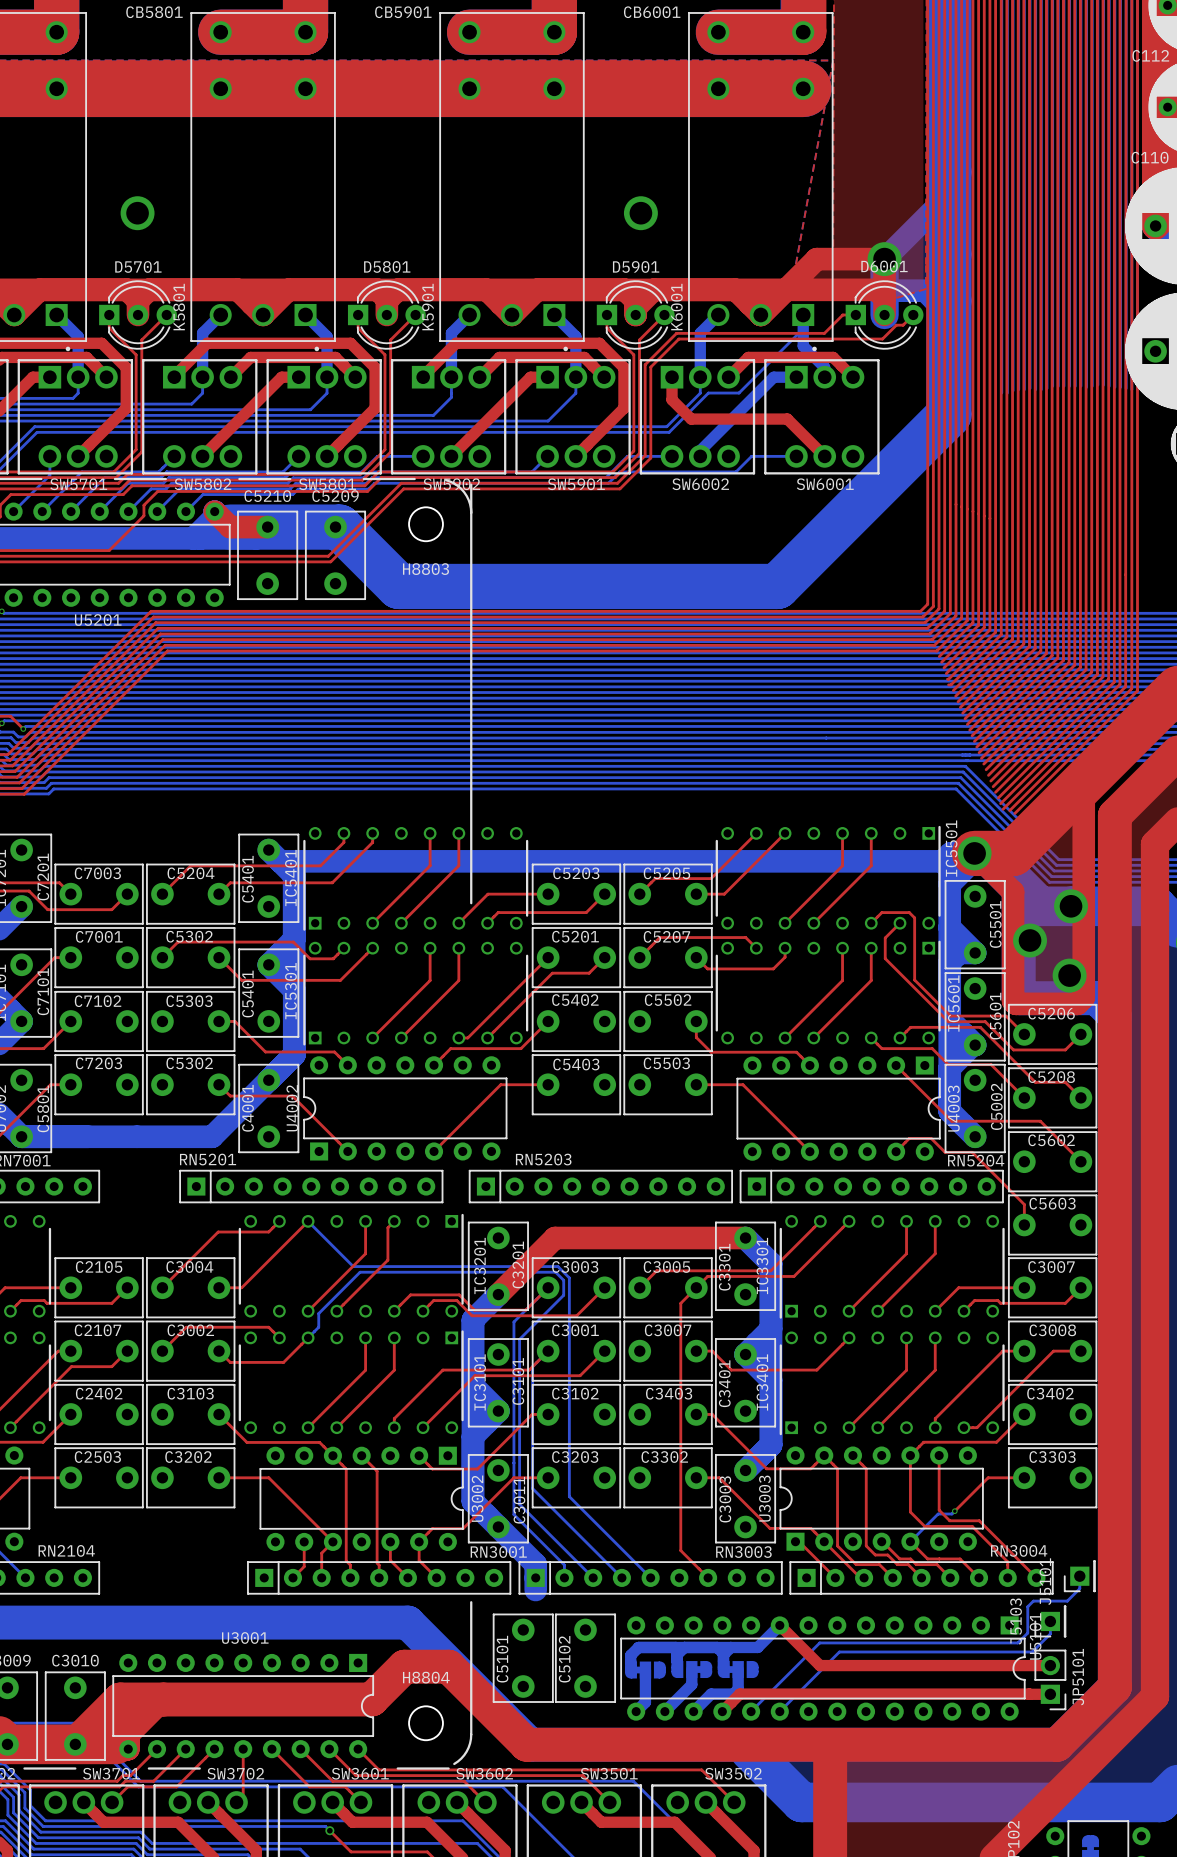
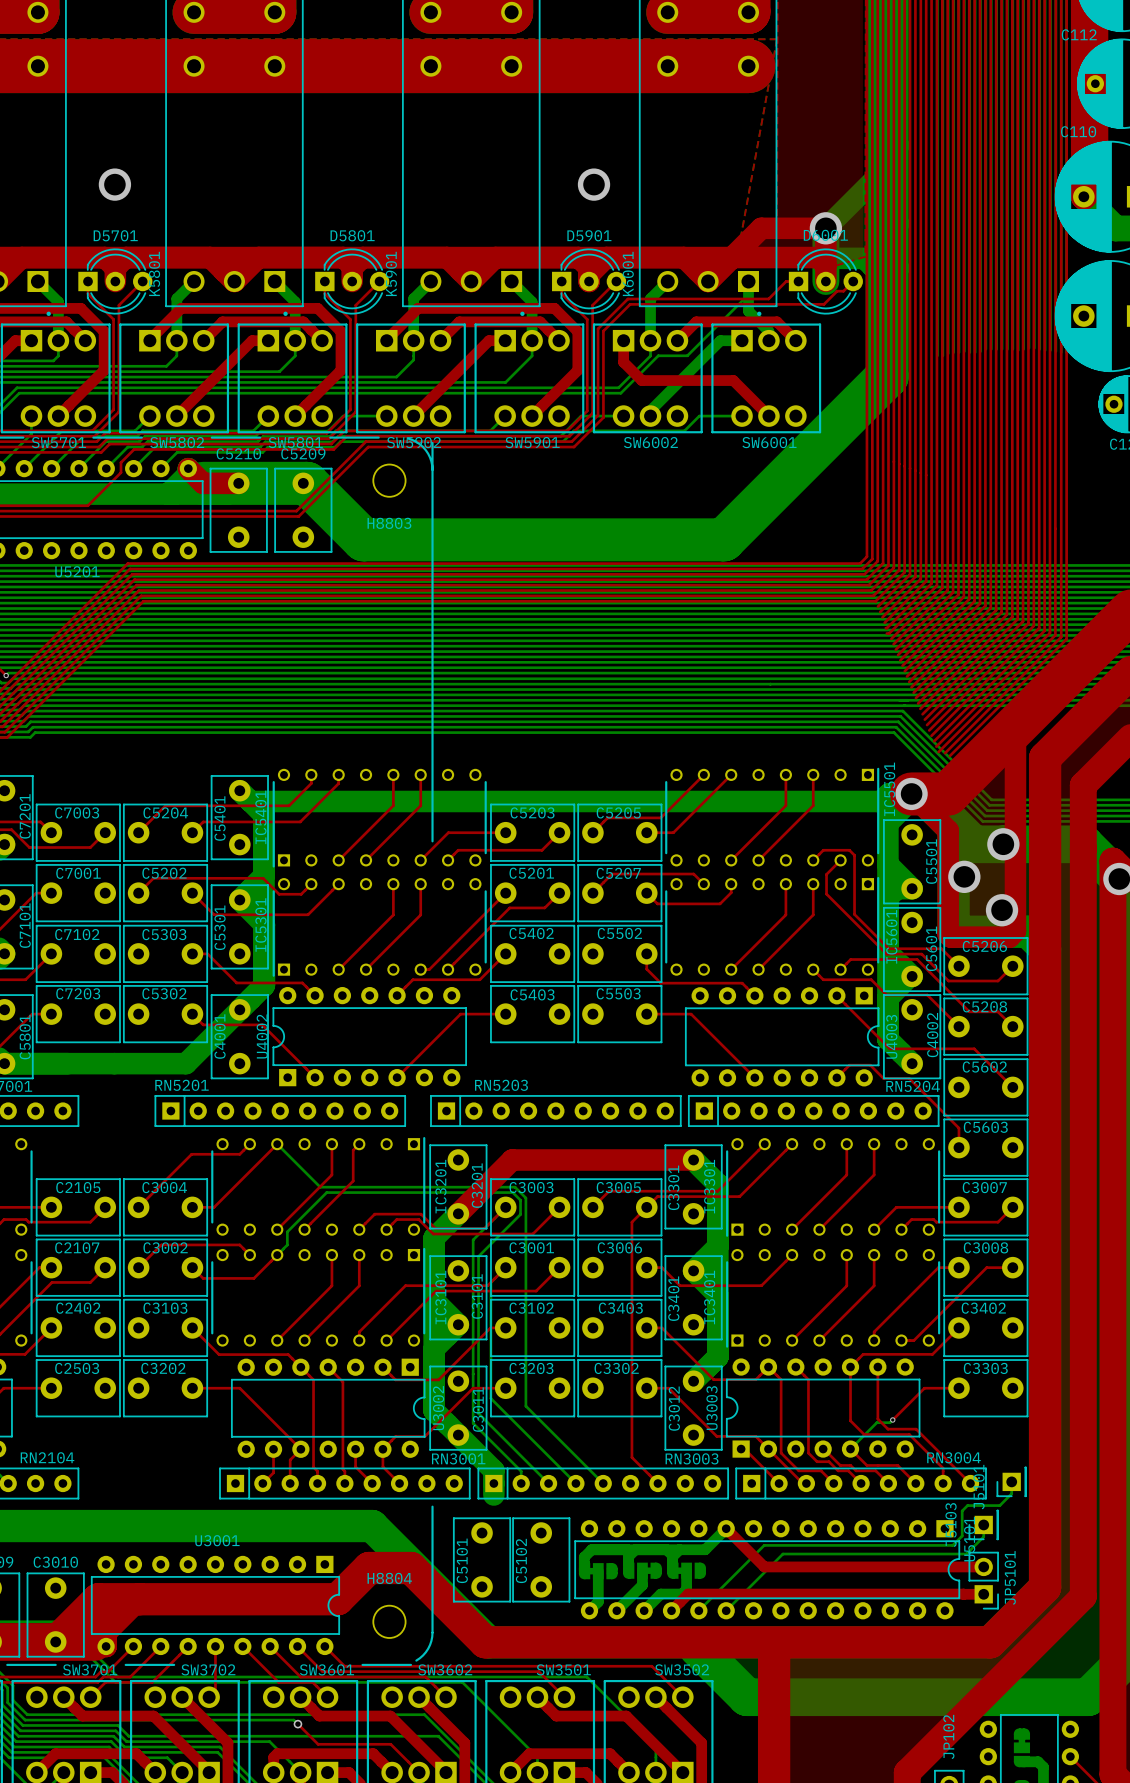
C5302 name: C5302 (189, 936) -> C5202 (164, 873)
C5401 name: C5401 (247, 994) -> C5301 (220, 927)
C5002 name: C5002 (996, 1106) -> C4002 (932, 1035)
C3007 name: C3007 (668, 1330) -> C3006 (619, 1247)
C3003 name: C3003 (725, 1499) -> C3012 (674, 1408)

